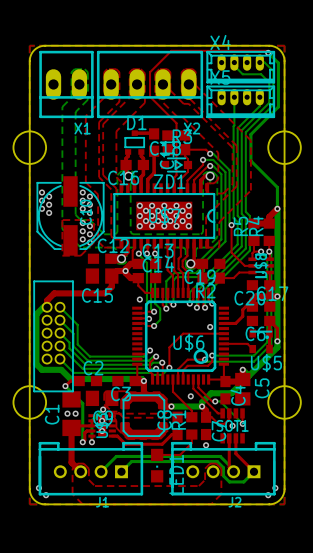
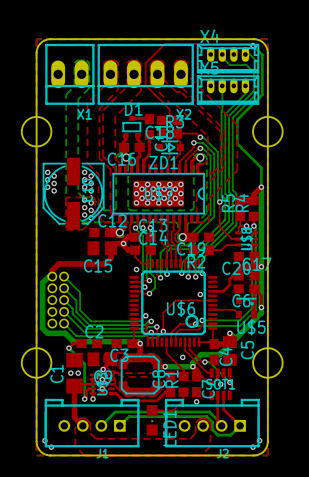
part footprint: [33, 280, 74, 393] -> [47, 271, 70, 329]

